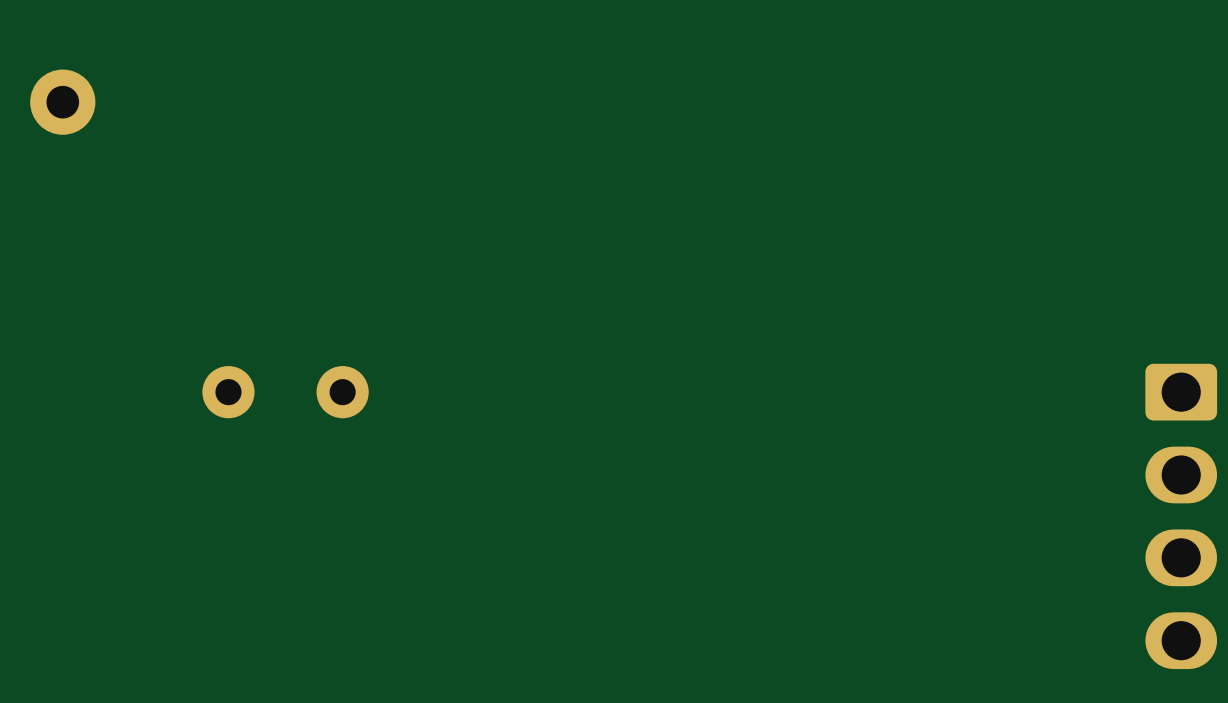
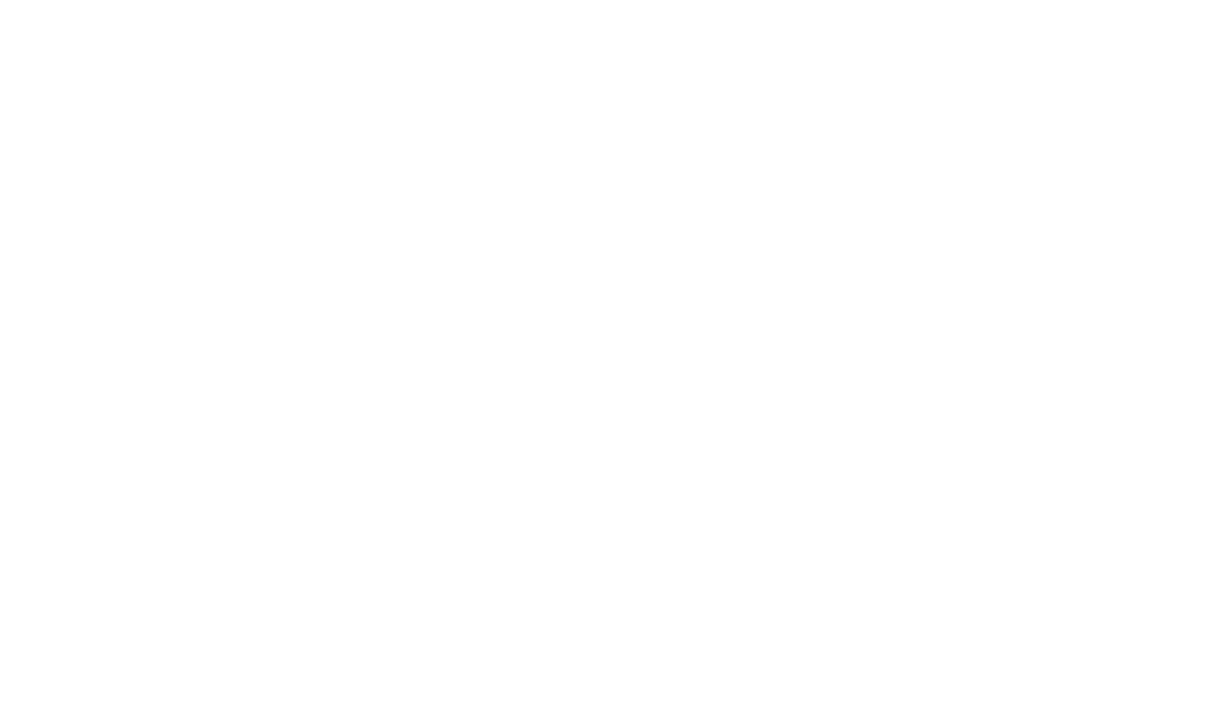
part: (62, 102) -> none
part: (285, 392) -> none
part: (1181, 516) -> none

